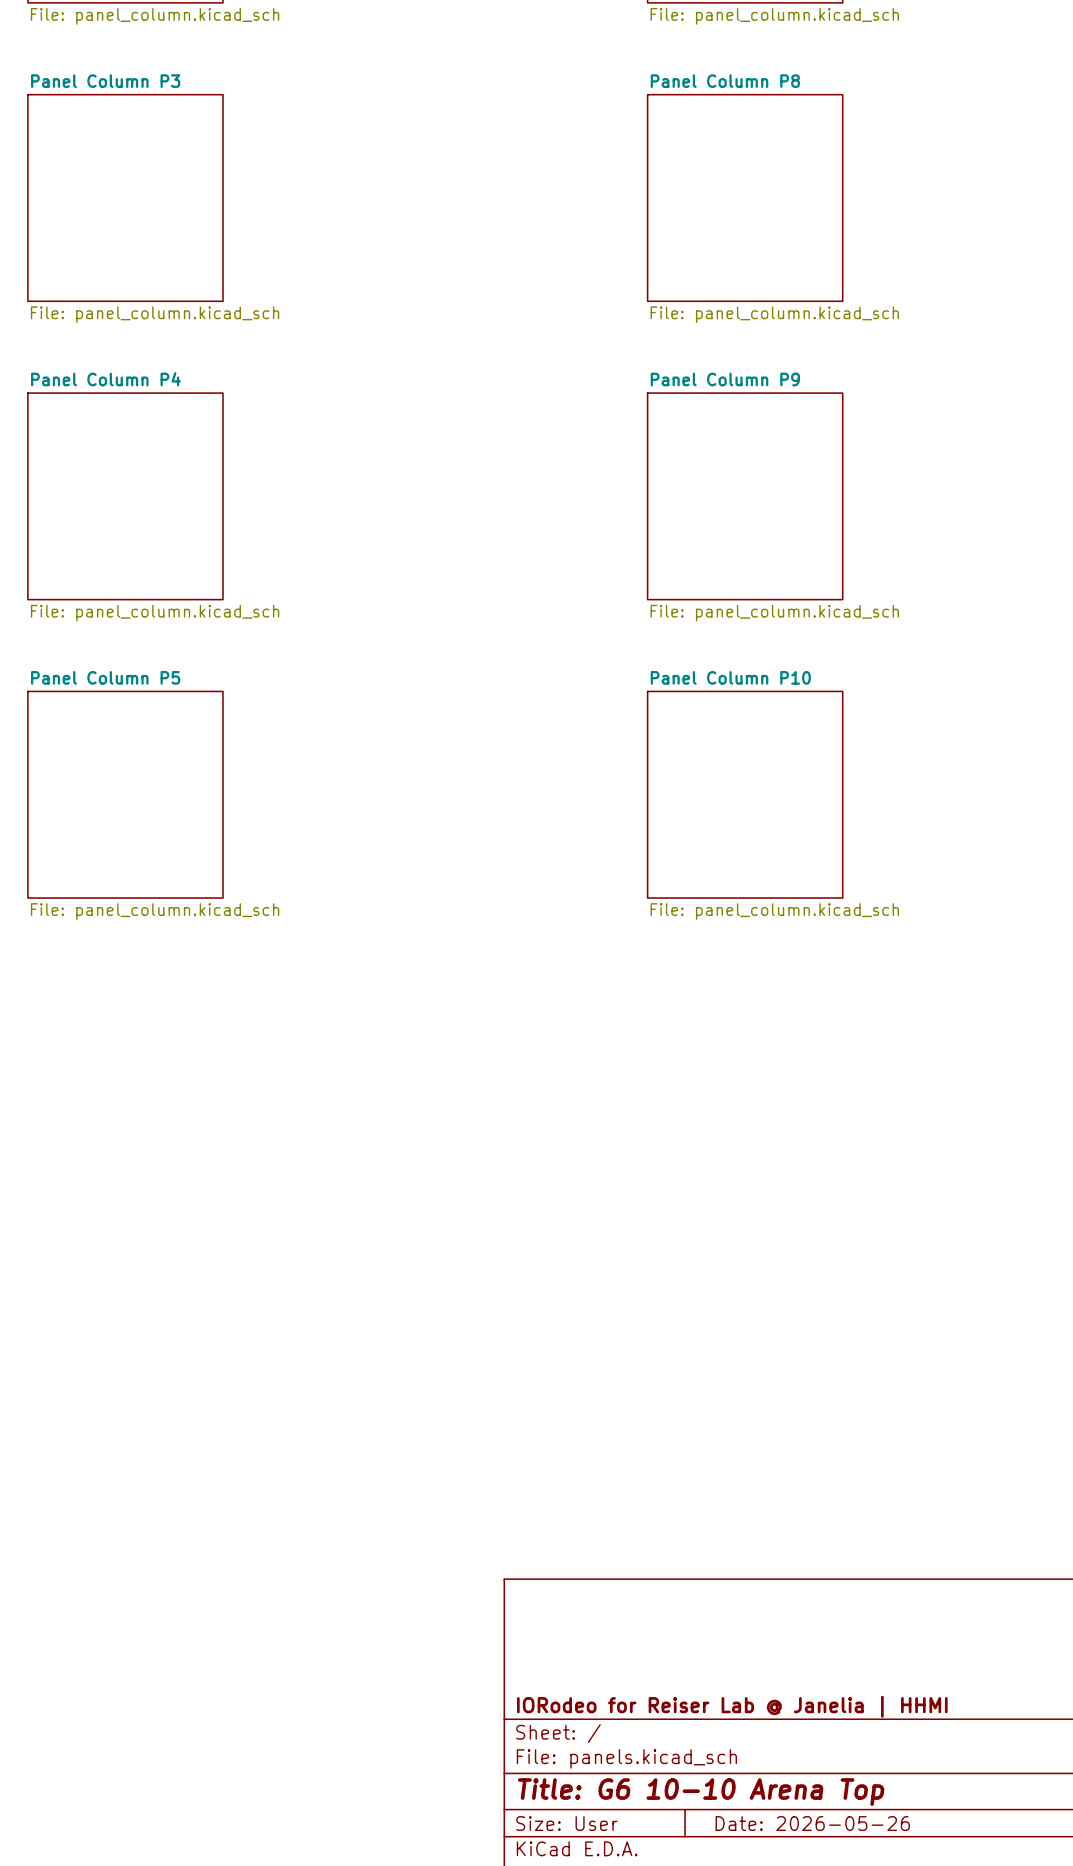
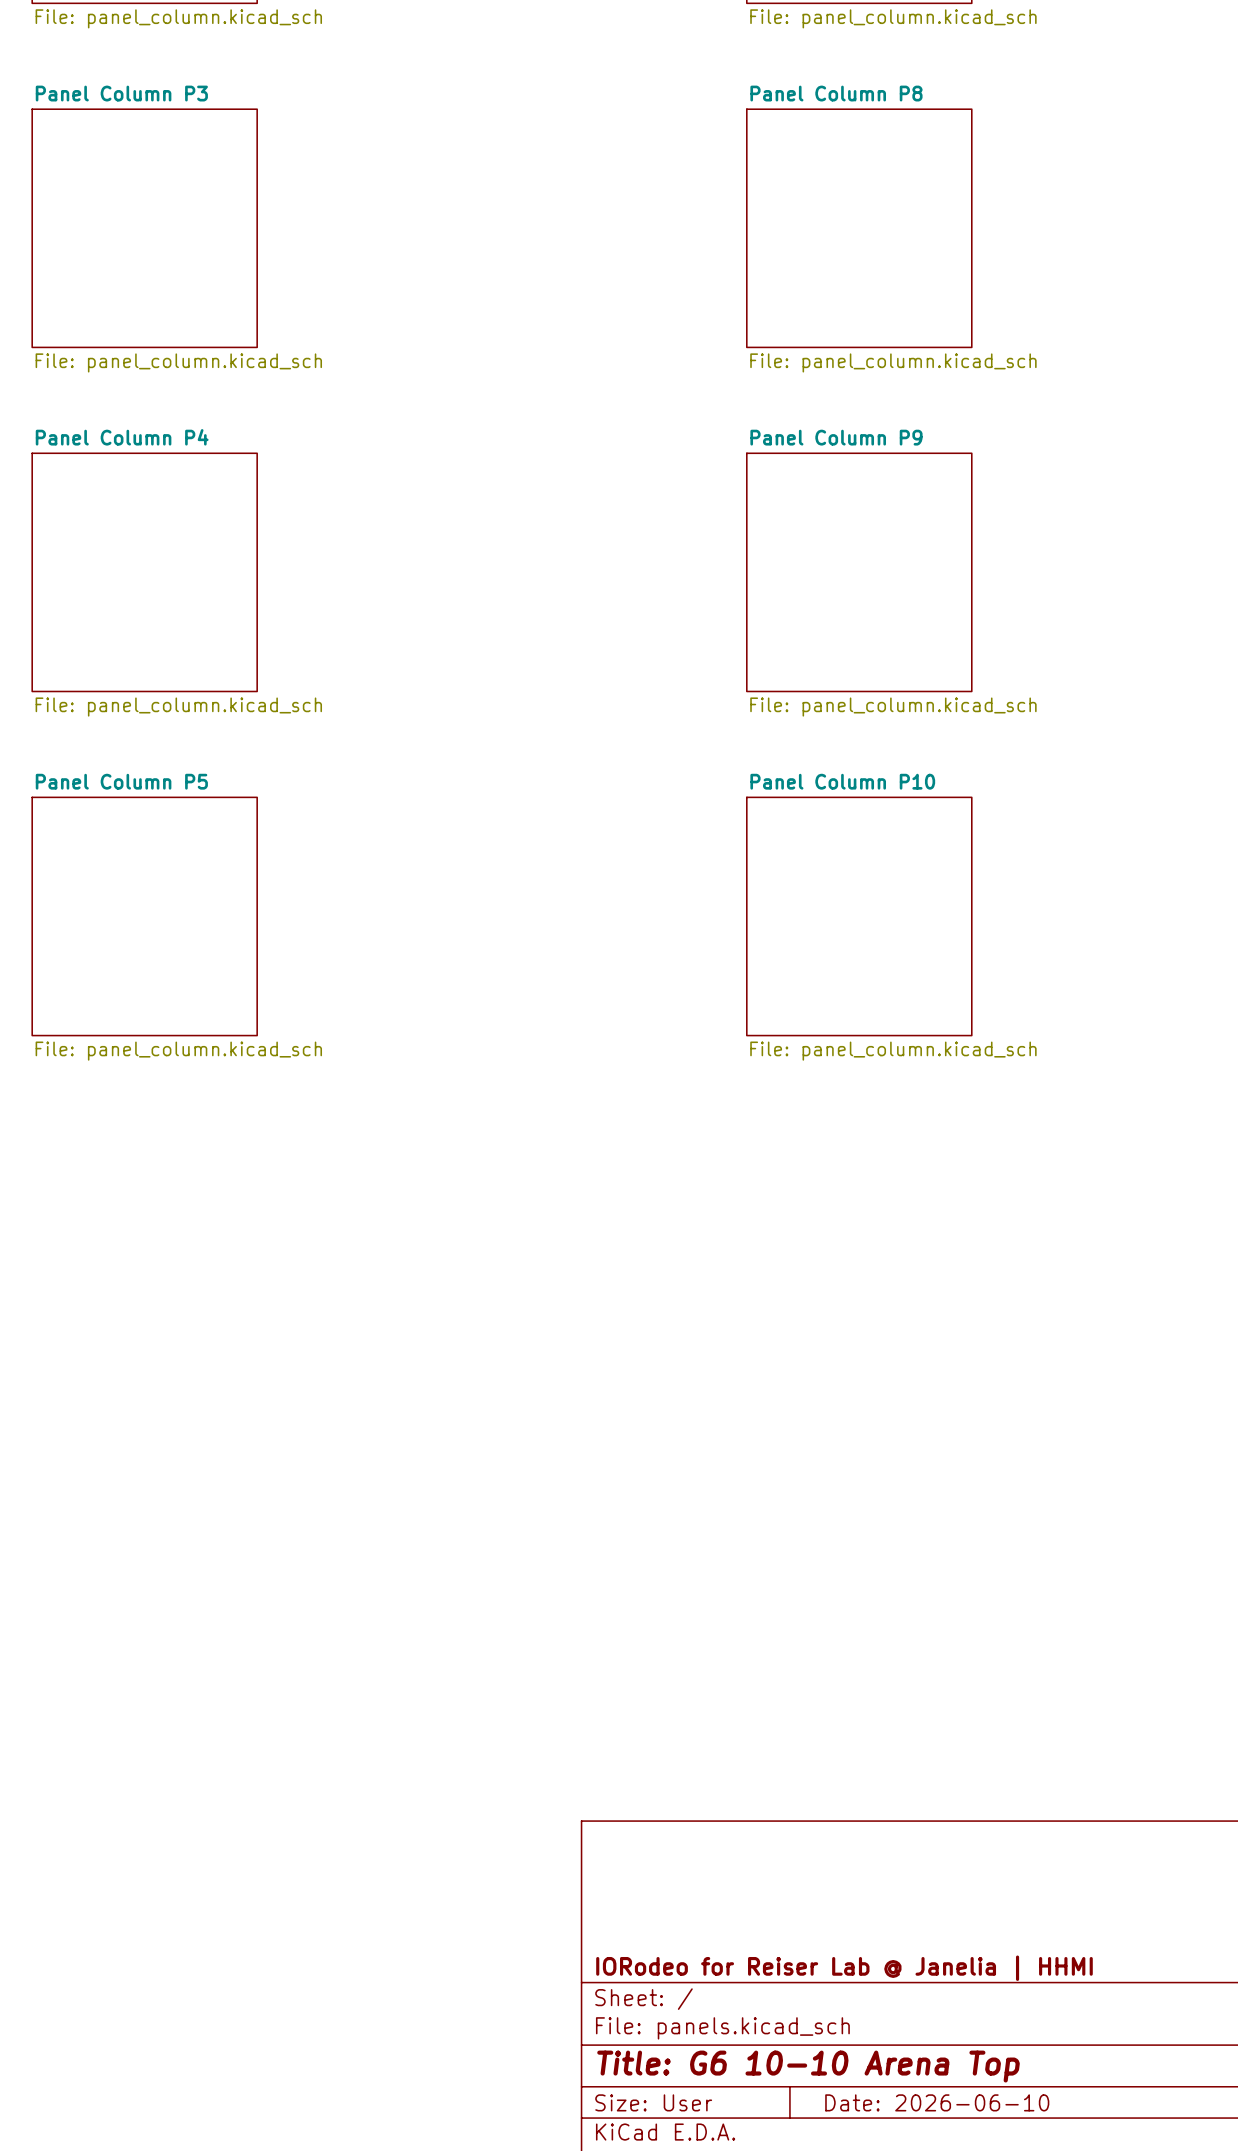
title block: Date: 2026-05-26 (812, 1823) -> Date: 2026-06-10 (937, 2102)

